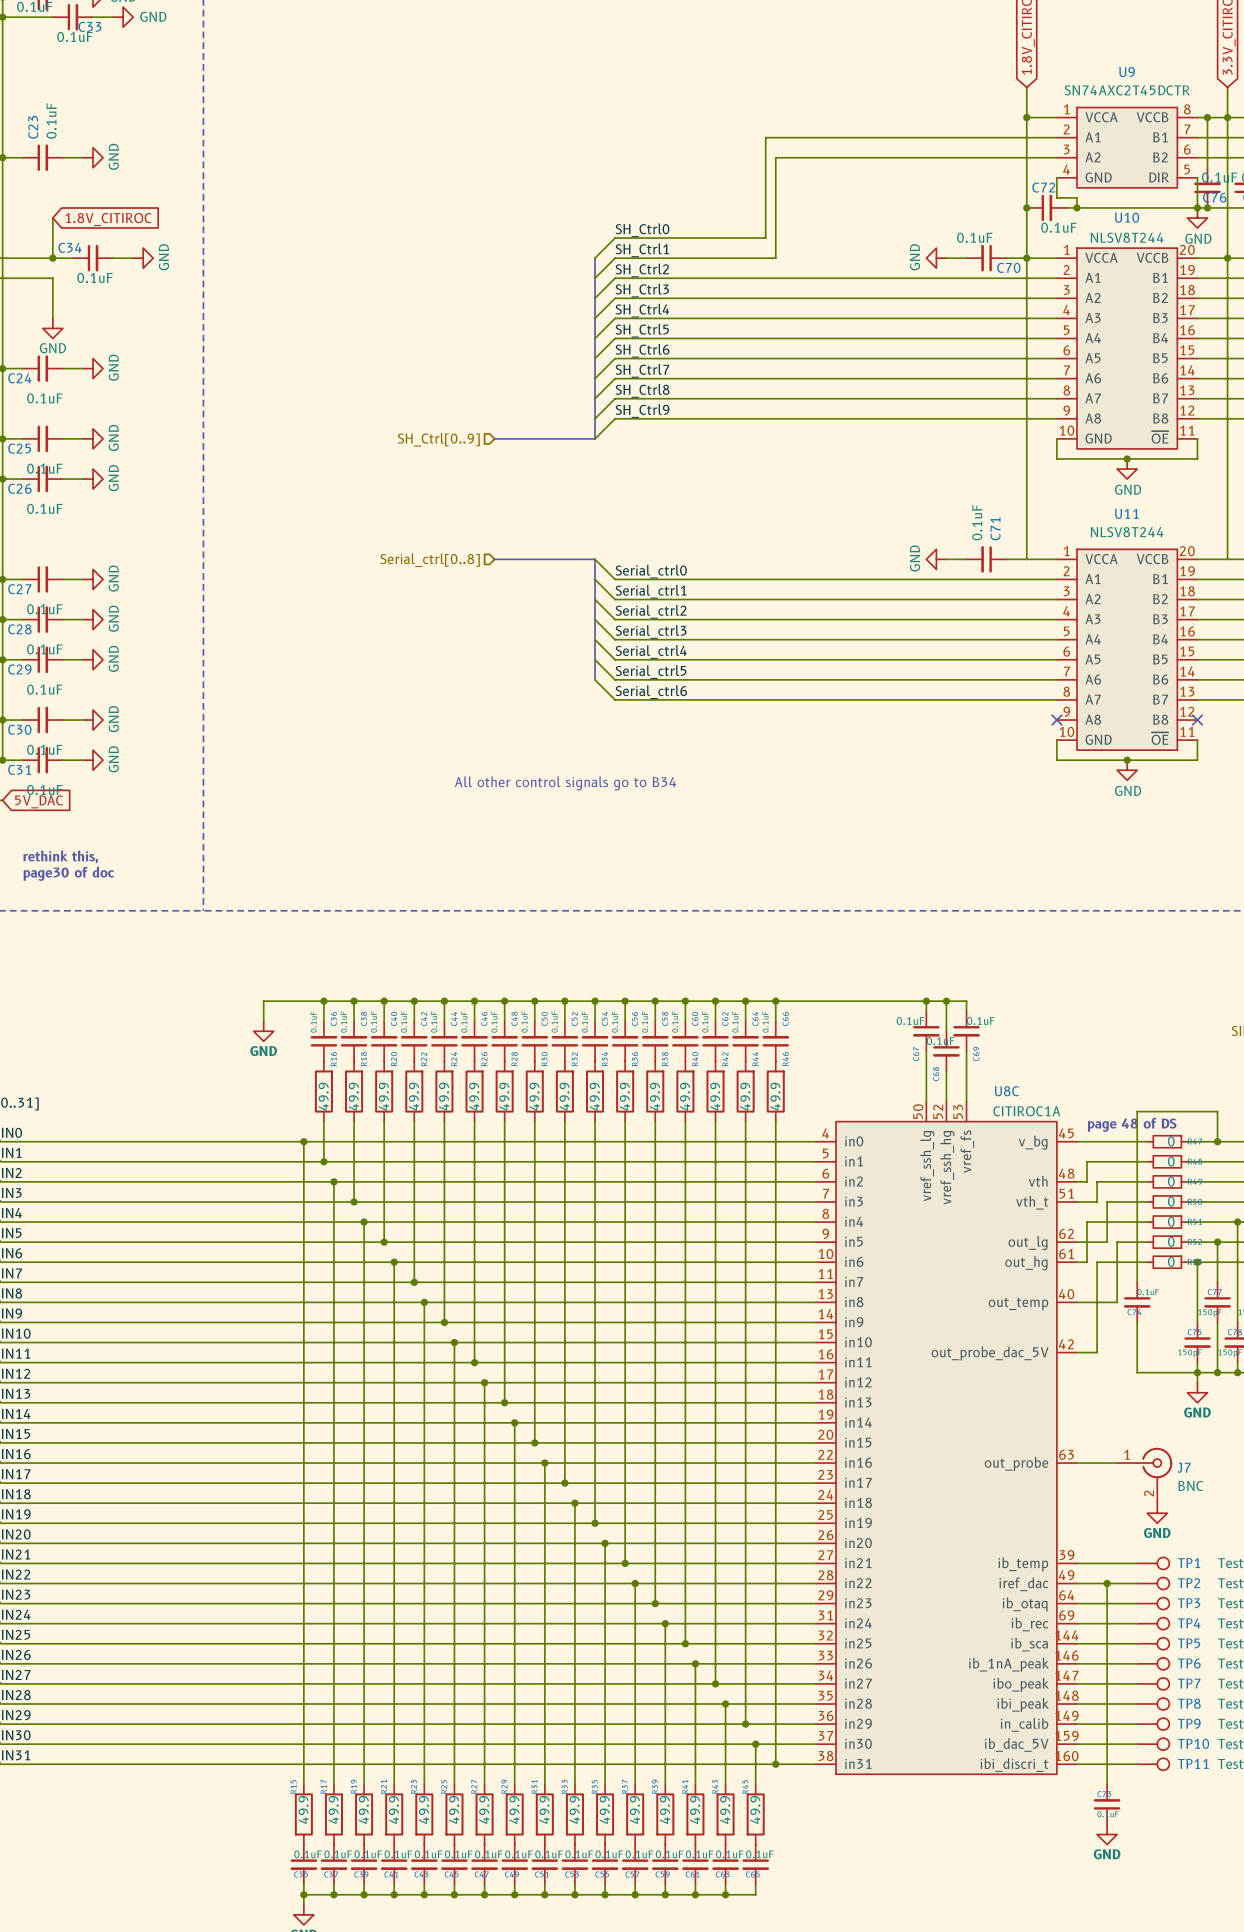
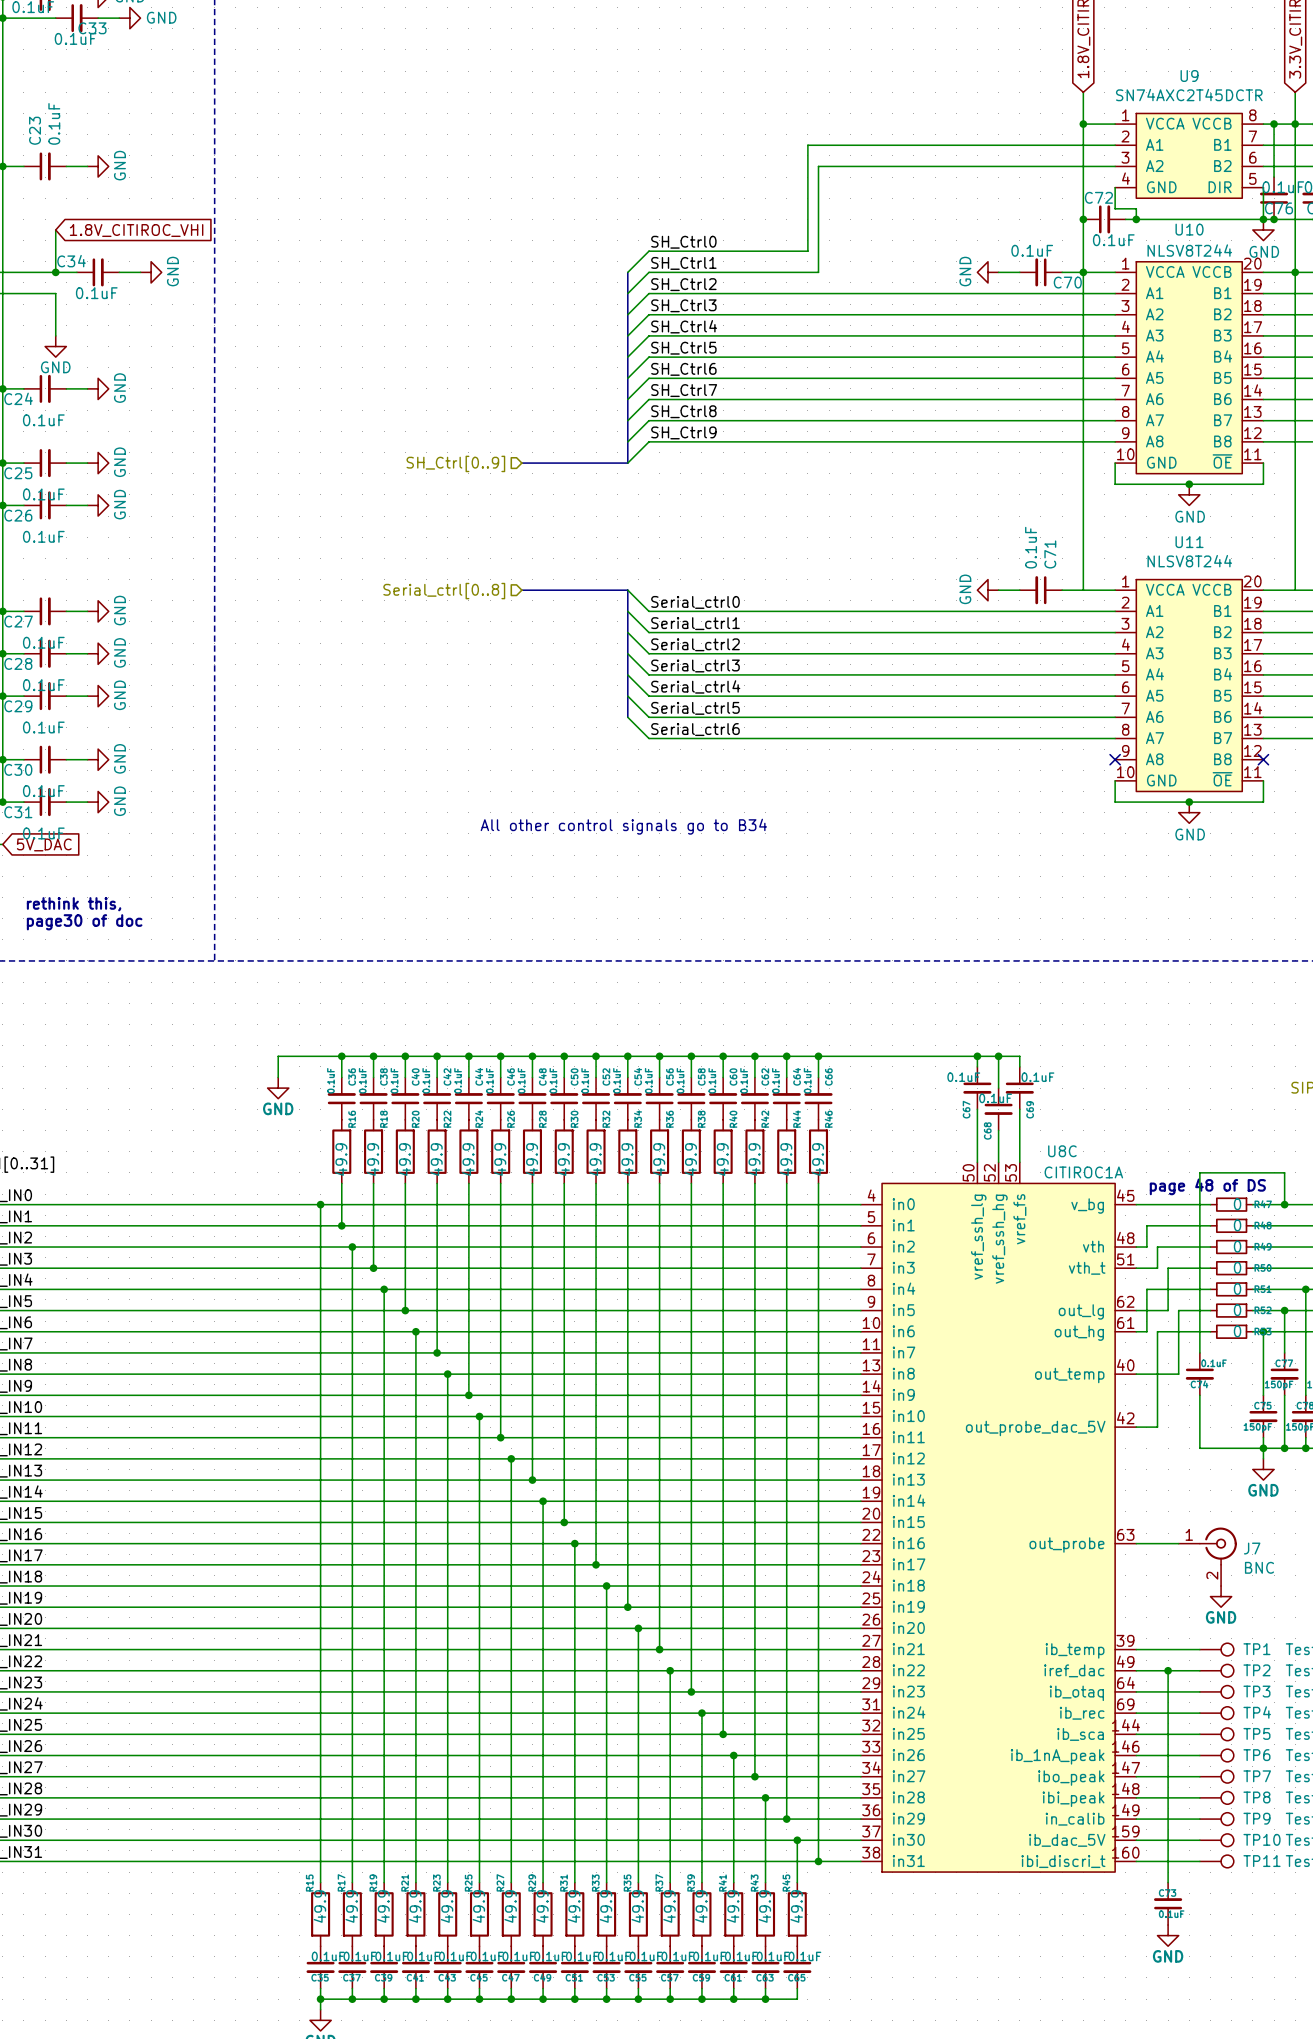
global label: 1.8V_CITIROC (108, 219) -> 1.8V_CITIROC_VHI (136, 230)

